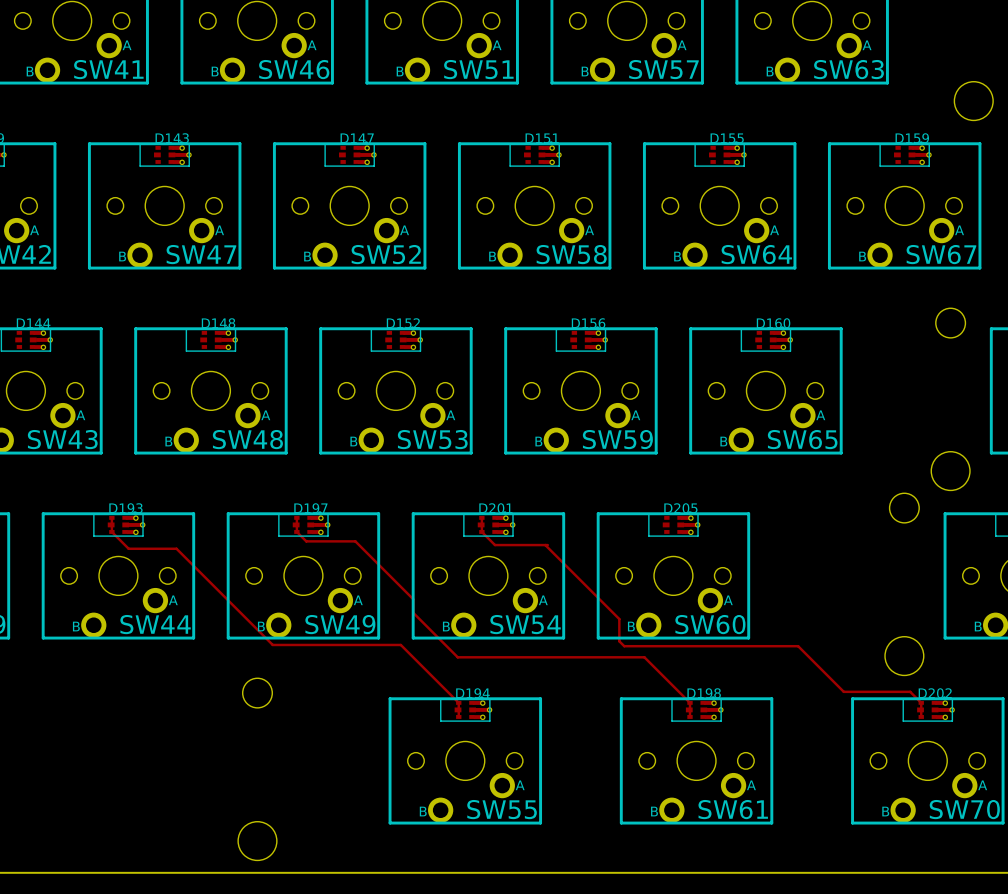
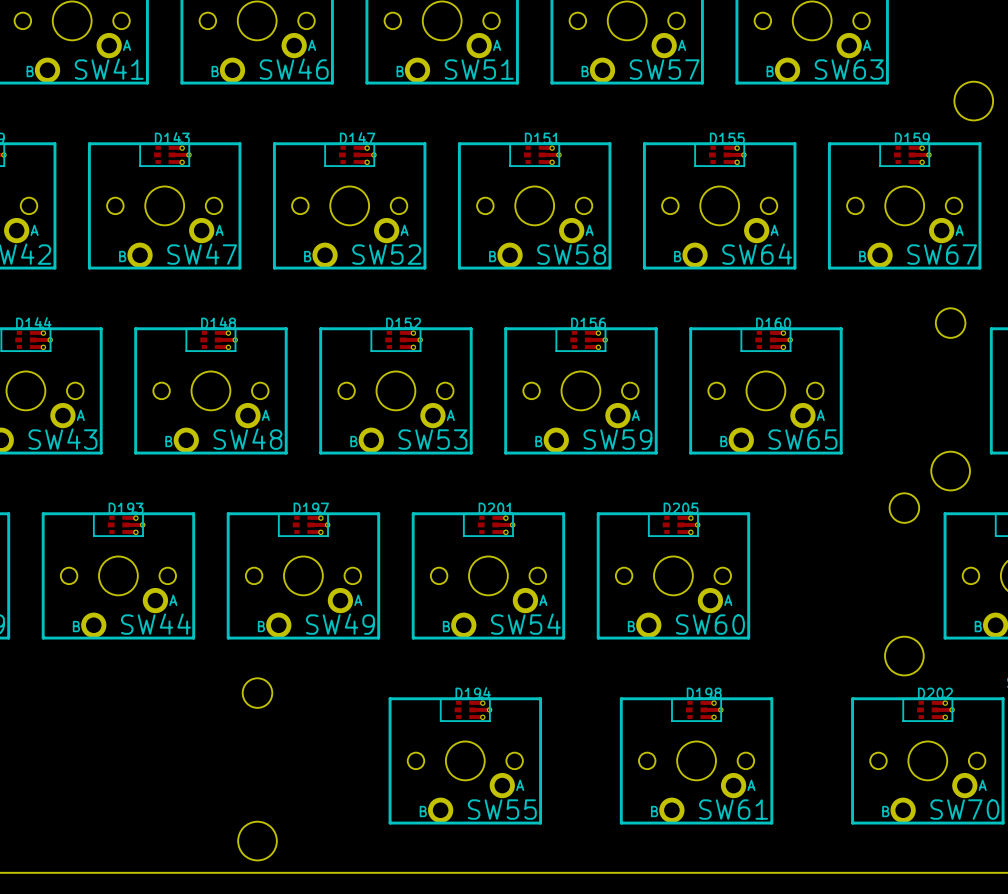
track: (111, 517) (111, 531) (128, 548) (176, 548) (272, 644) (400, 644) (458, 702) (458, 716) -> none
track: (296, 517) (296, 531) (306, 541) (355, 541) (413, 599) (413, 612) (457, 657) (644, 657) (690, 702) (690, 716) -> none
track: (481, 517) (481, 531) (494, 545) (547, 545) -> none
track: (545, 545) (619, 619) (619, 641) (624, 646) (798, 646) (843, 691) (910, 691) (921, 702) (921, 716) -> none

